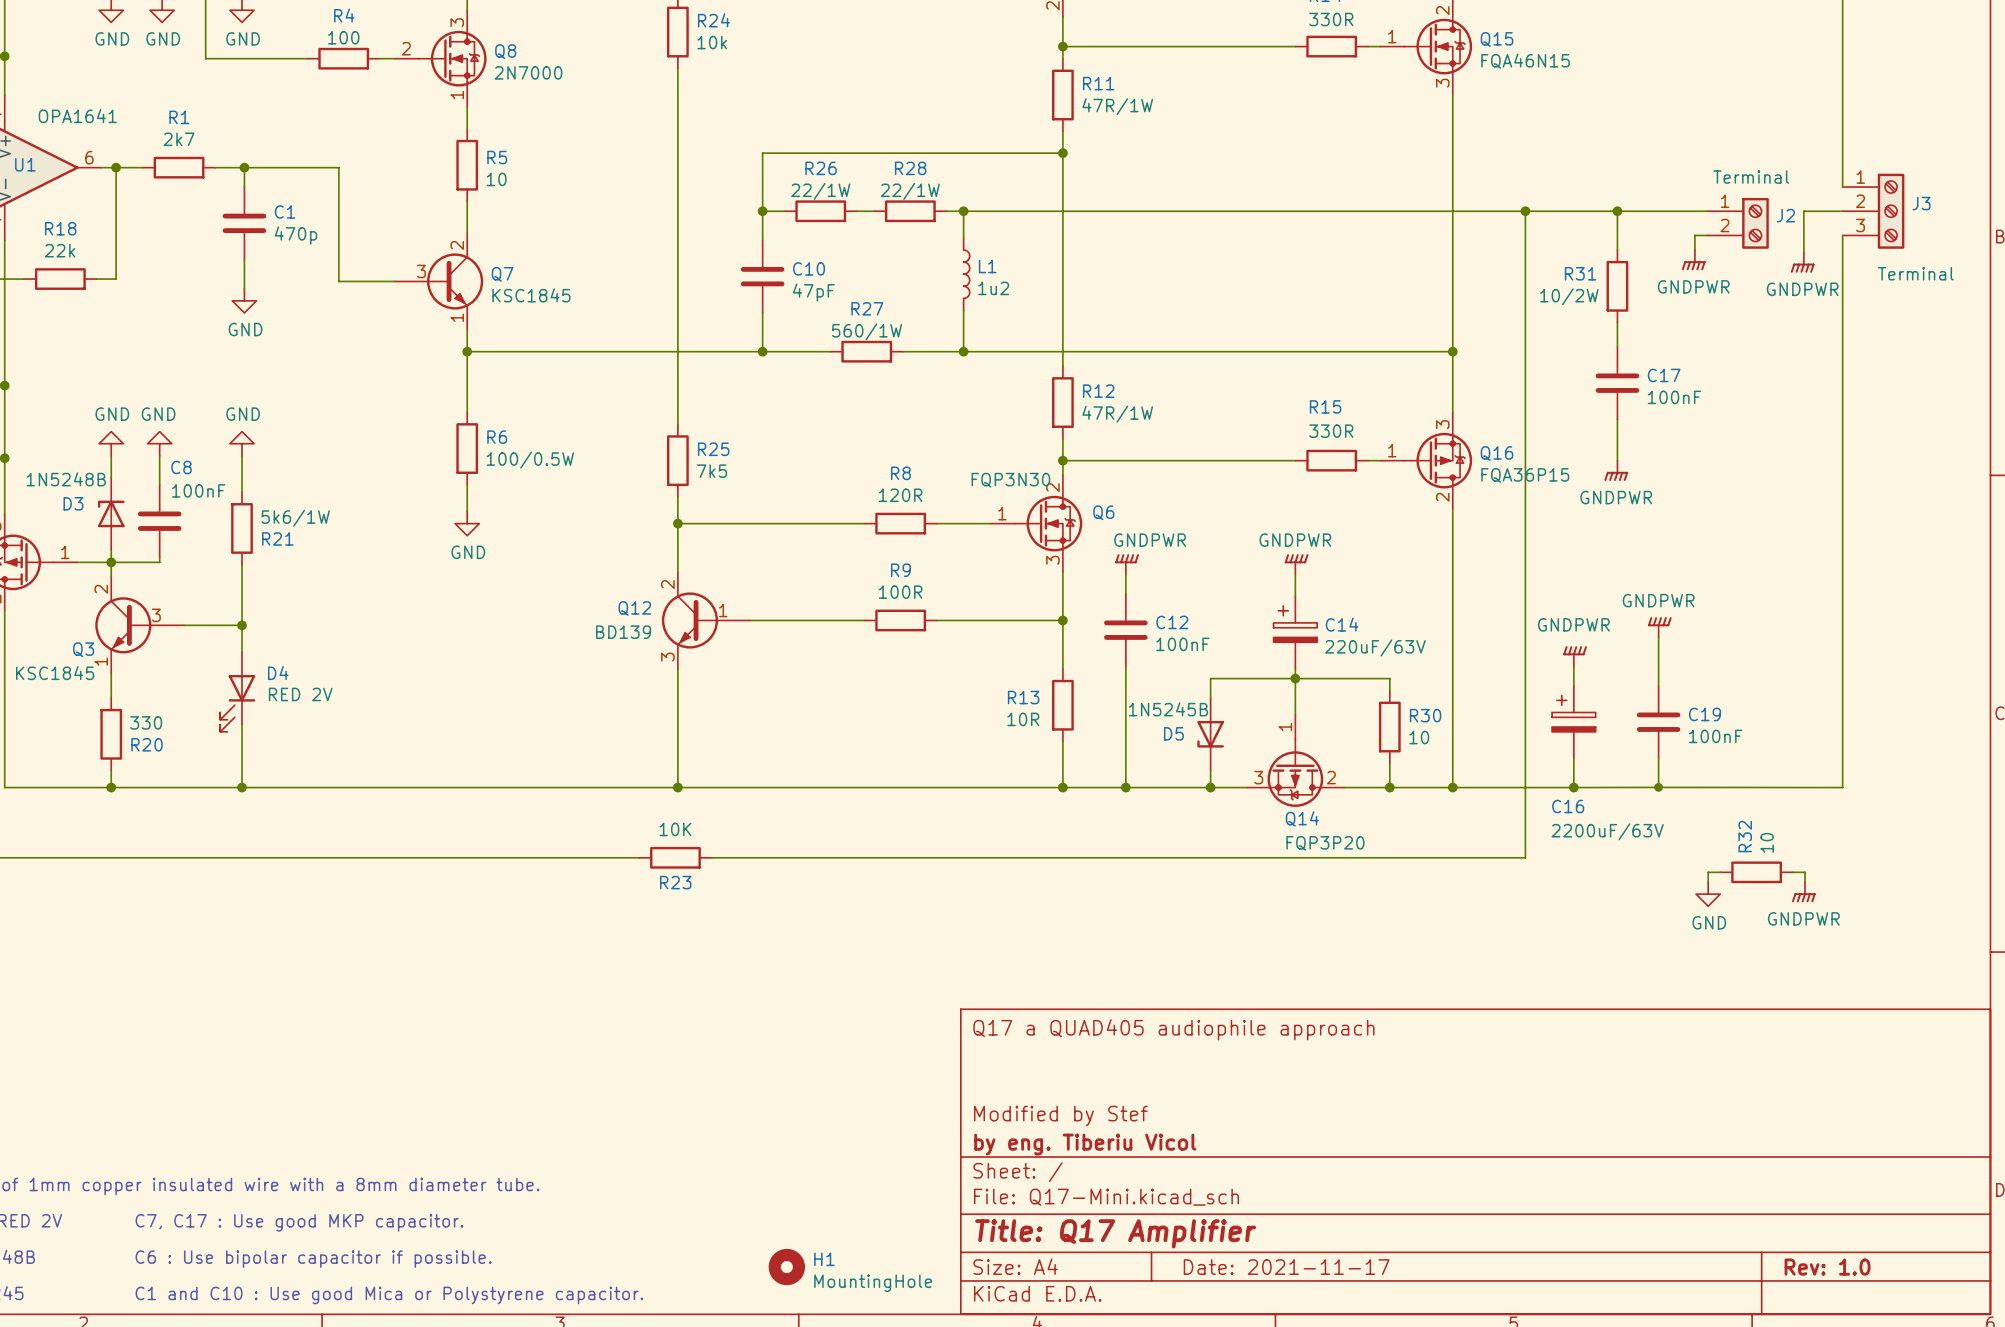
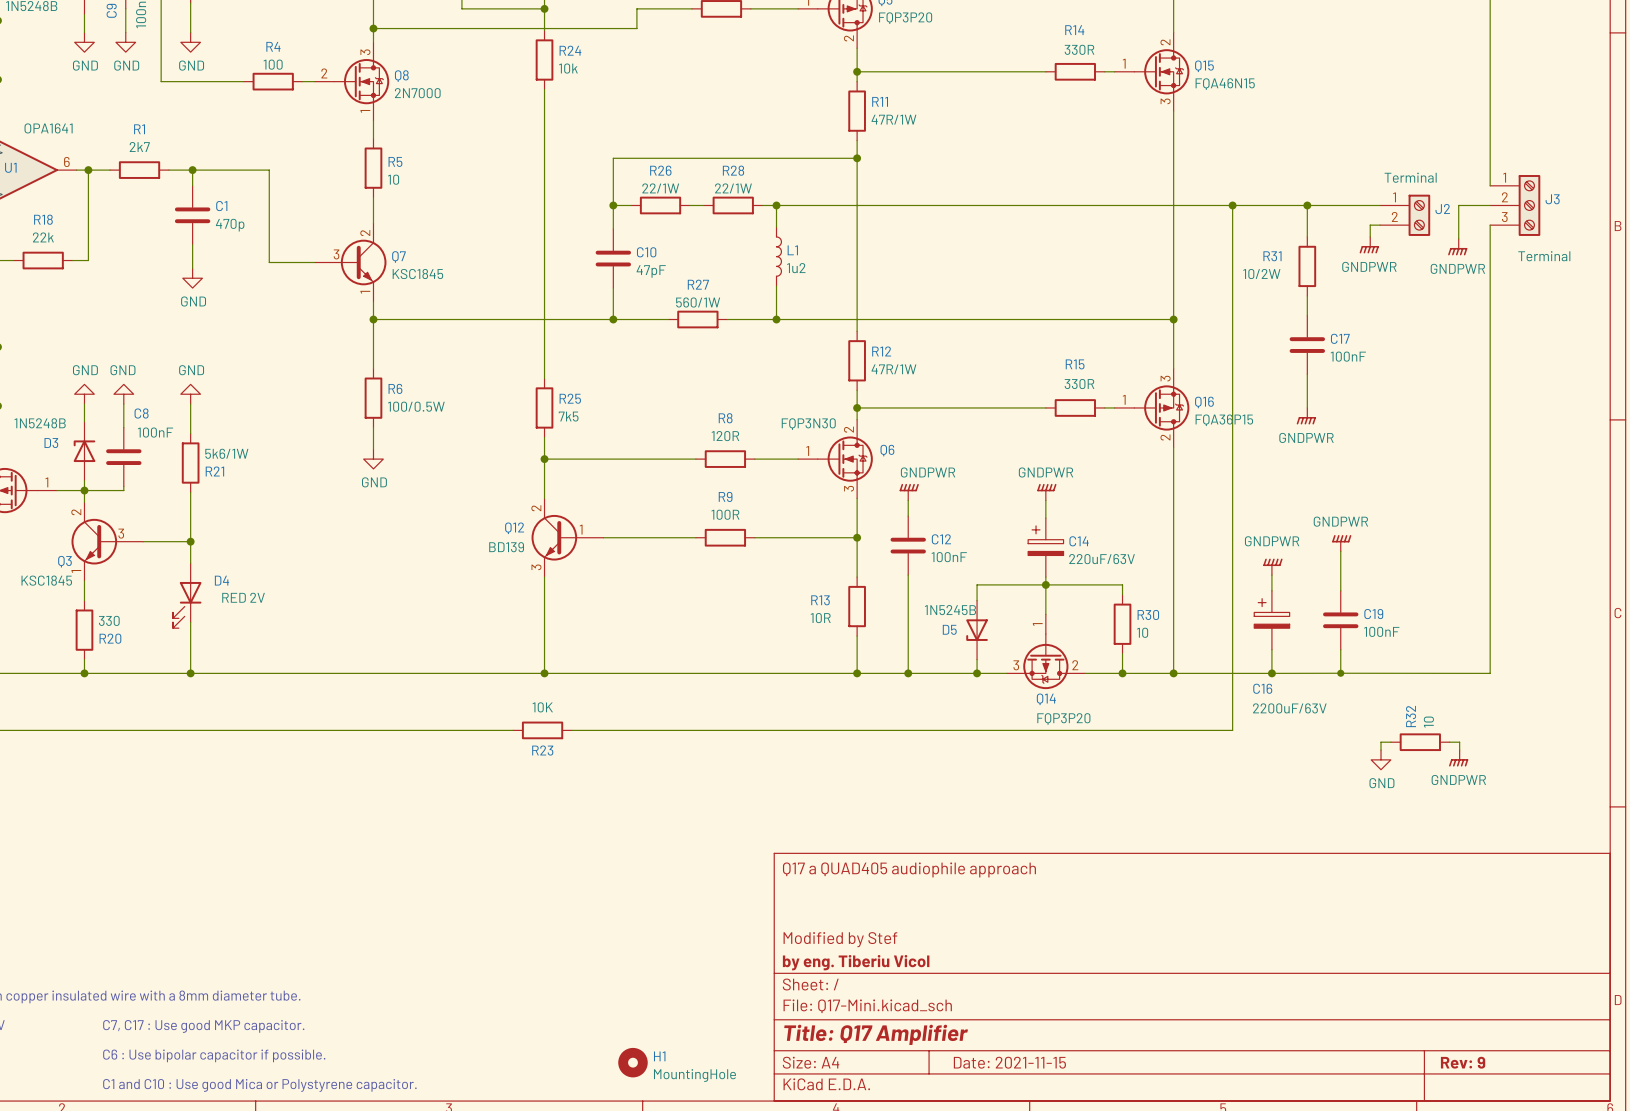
title block: Date: 2021-11-17 (1286, 1267) -> Date: 2021-11-15 (1009, 1062)
title block: Rev: 1.0 (1827, 1267) -> Rev: 9 (1463, 1062)

